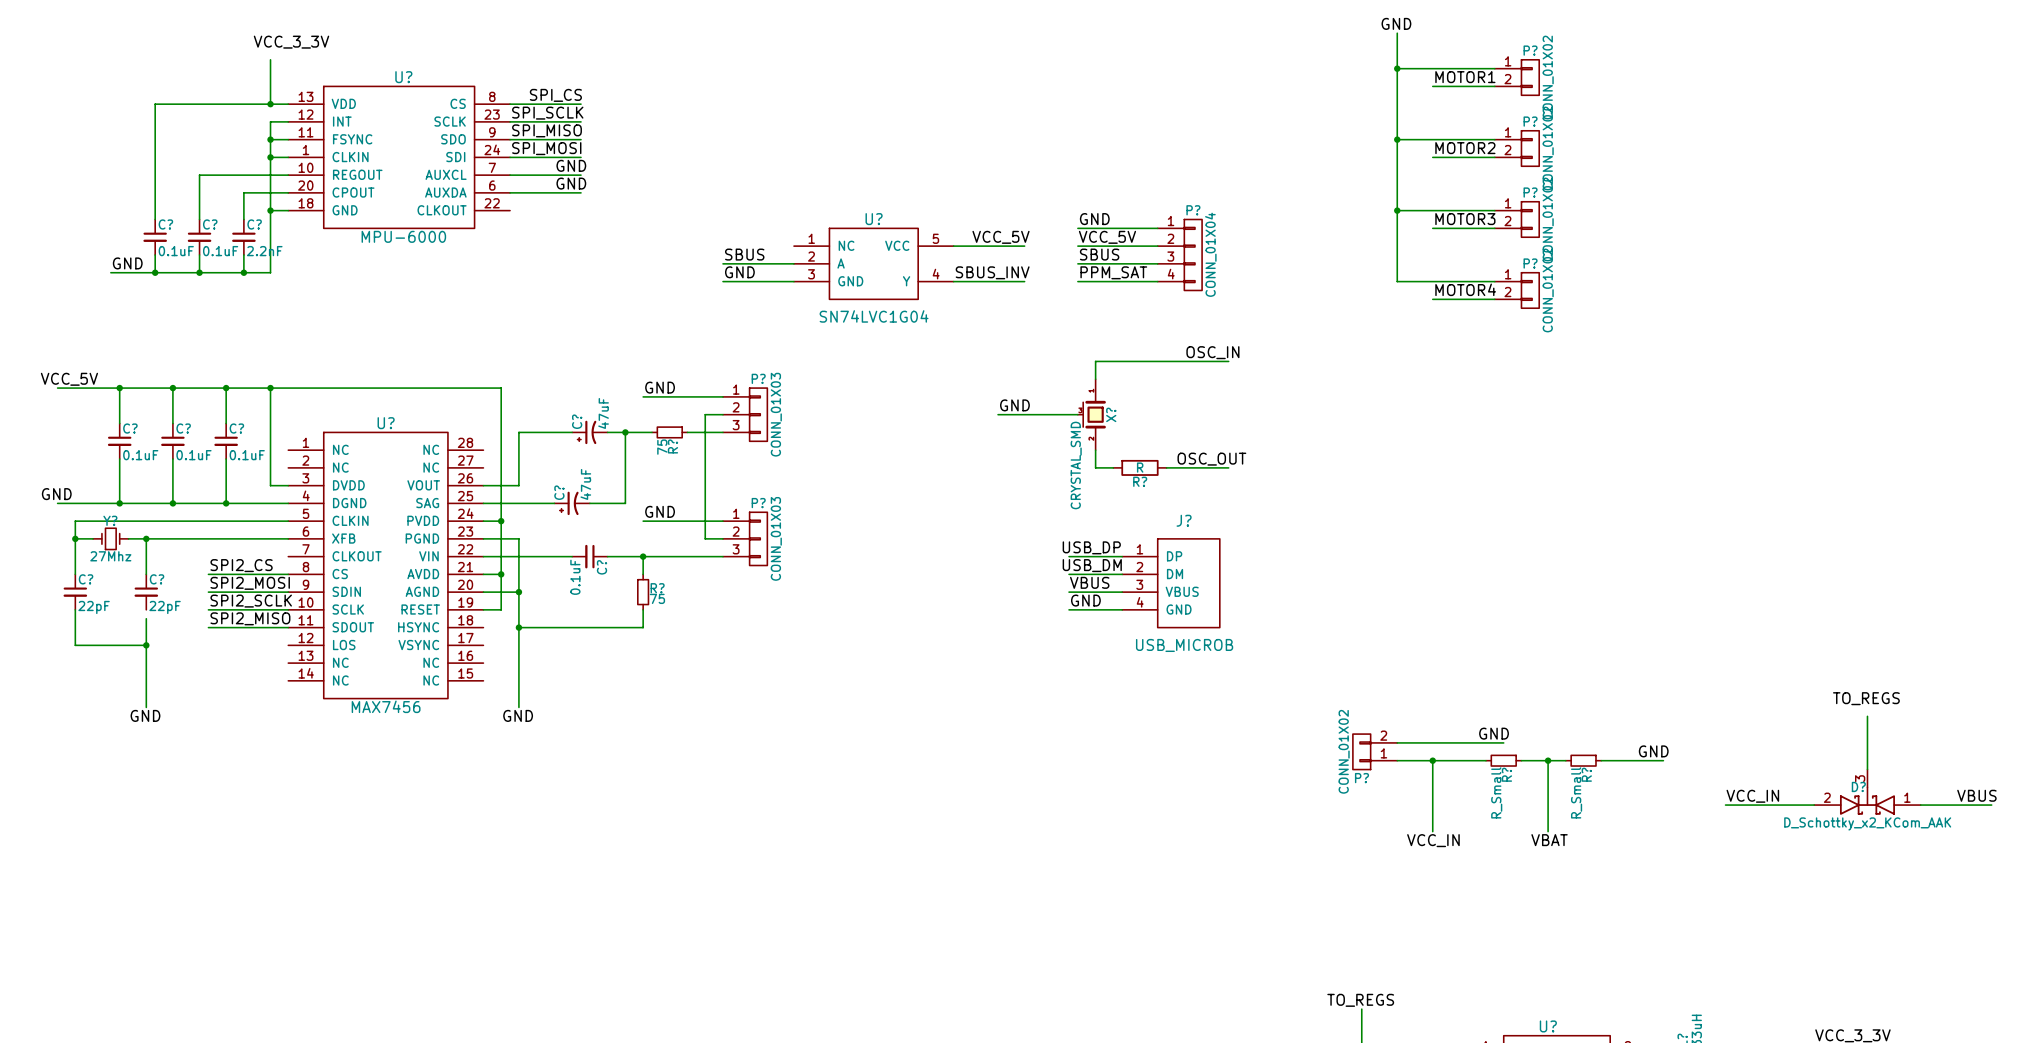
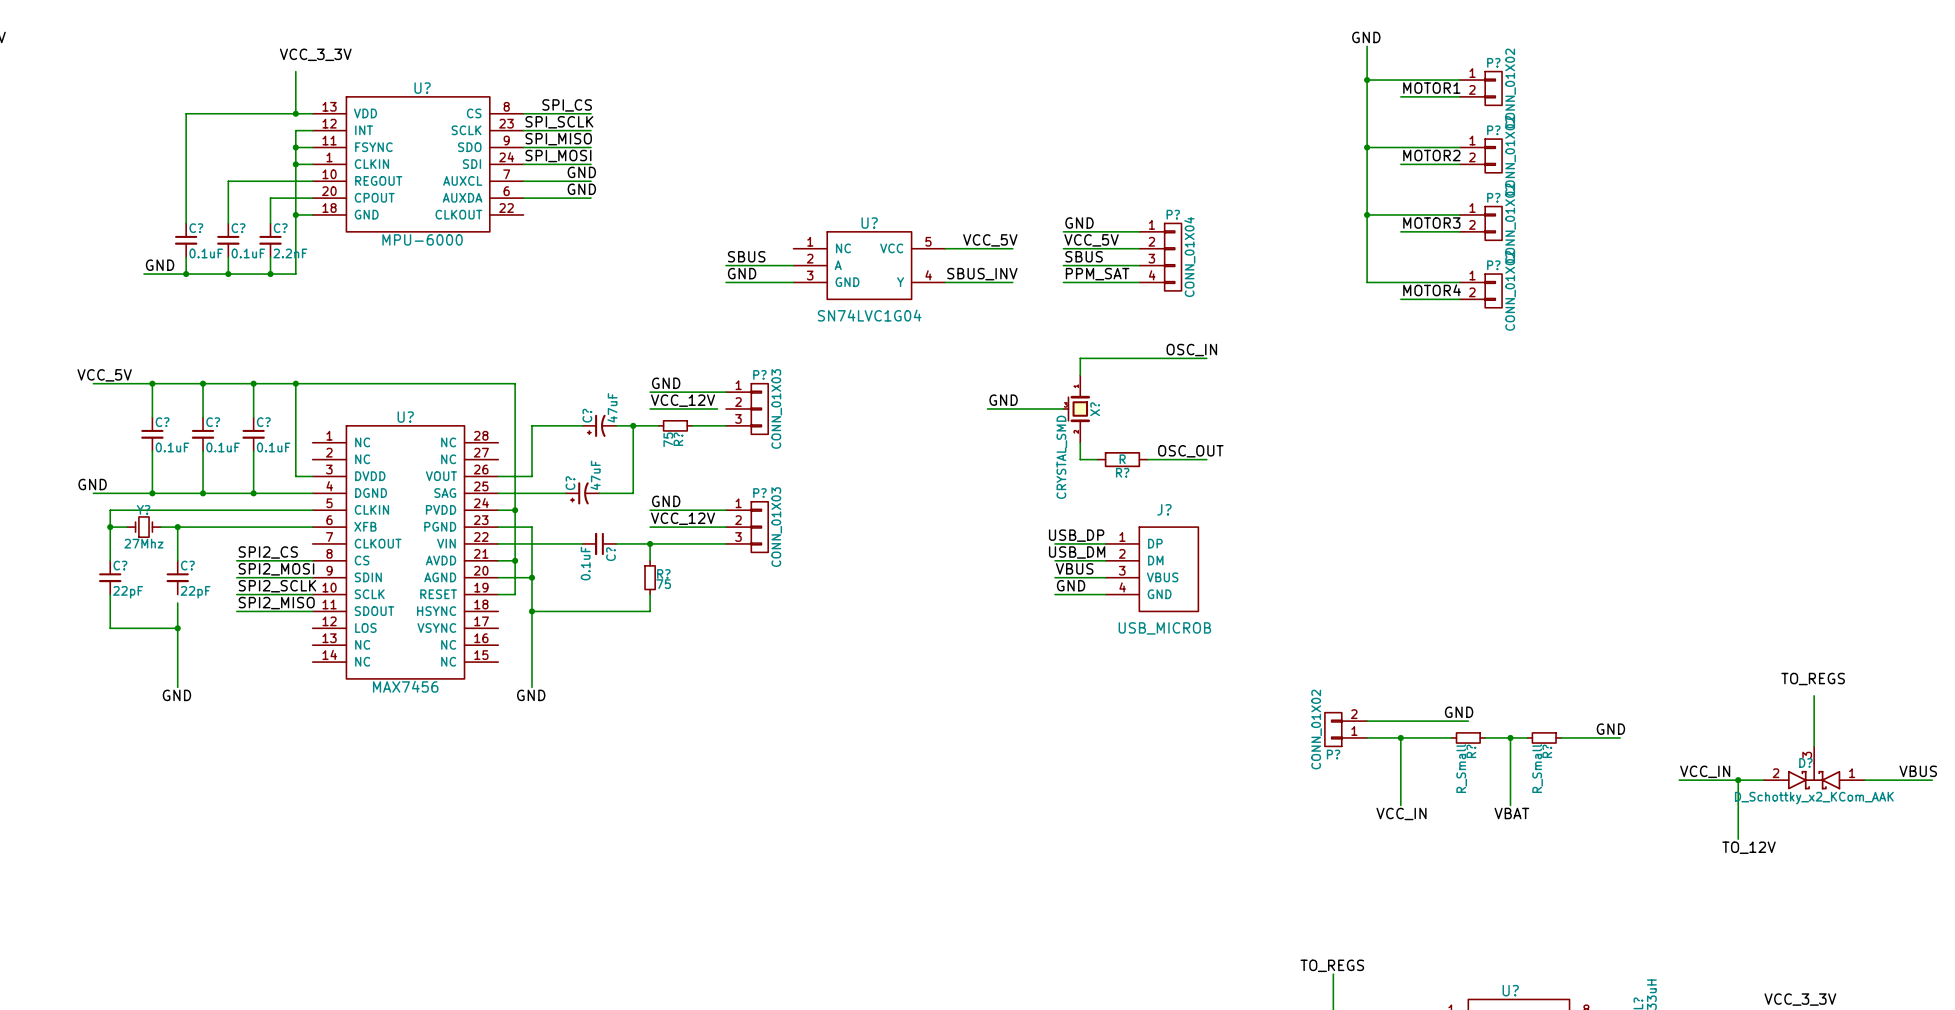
label: none -> VCC_12V (683, 400)
wire: (705, 414) (705, 538) -> (709, 409) (650, 409)
wire: (714, 414) (722, 414) -> none
label: none -> VCC_12V (683, 518)
wire: none -> (650, 527) (709, 527)
wire: none -> (1738, 780) (1738, 839)
junction: none -> (1738, 780)
label: none -> TO_12V (1749, 847)

